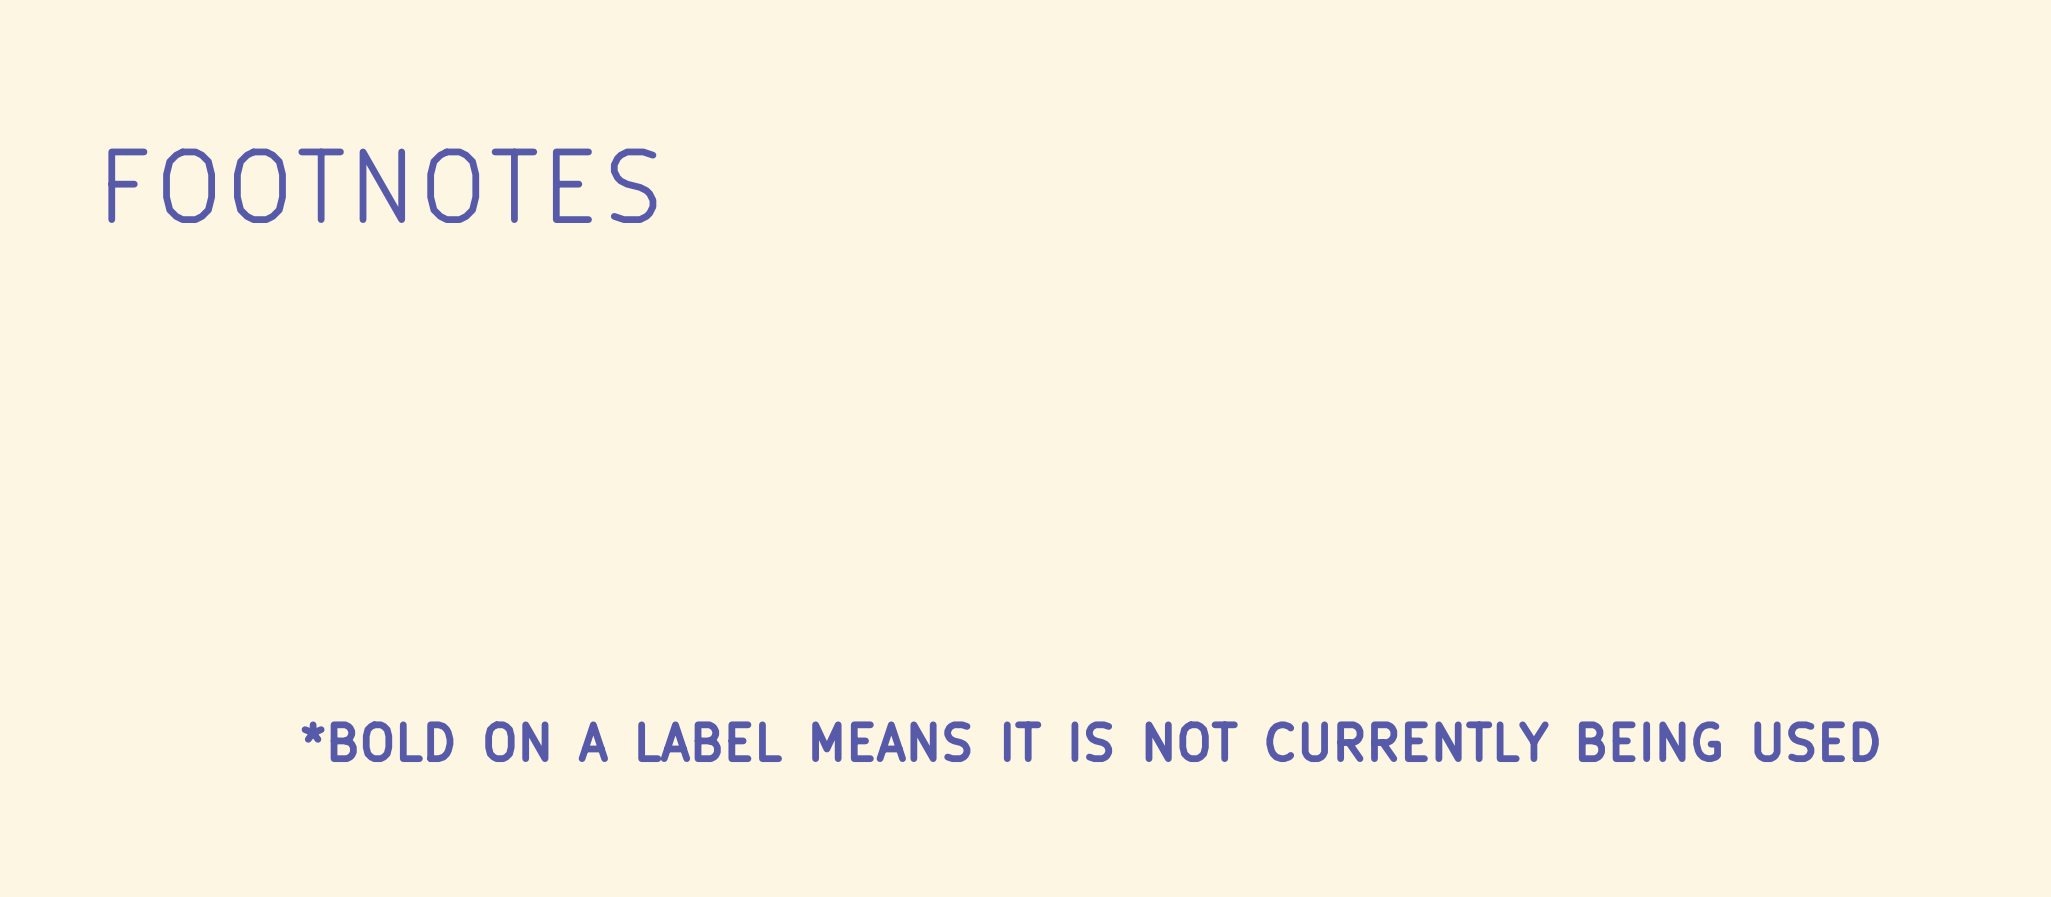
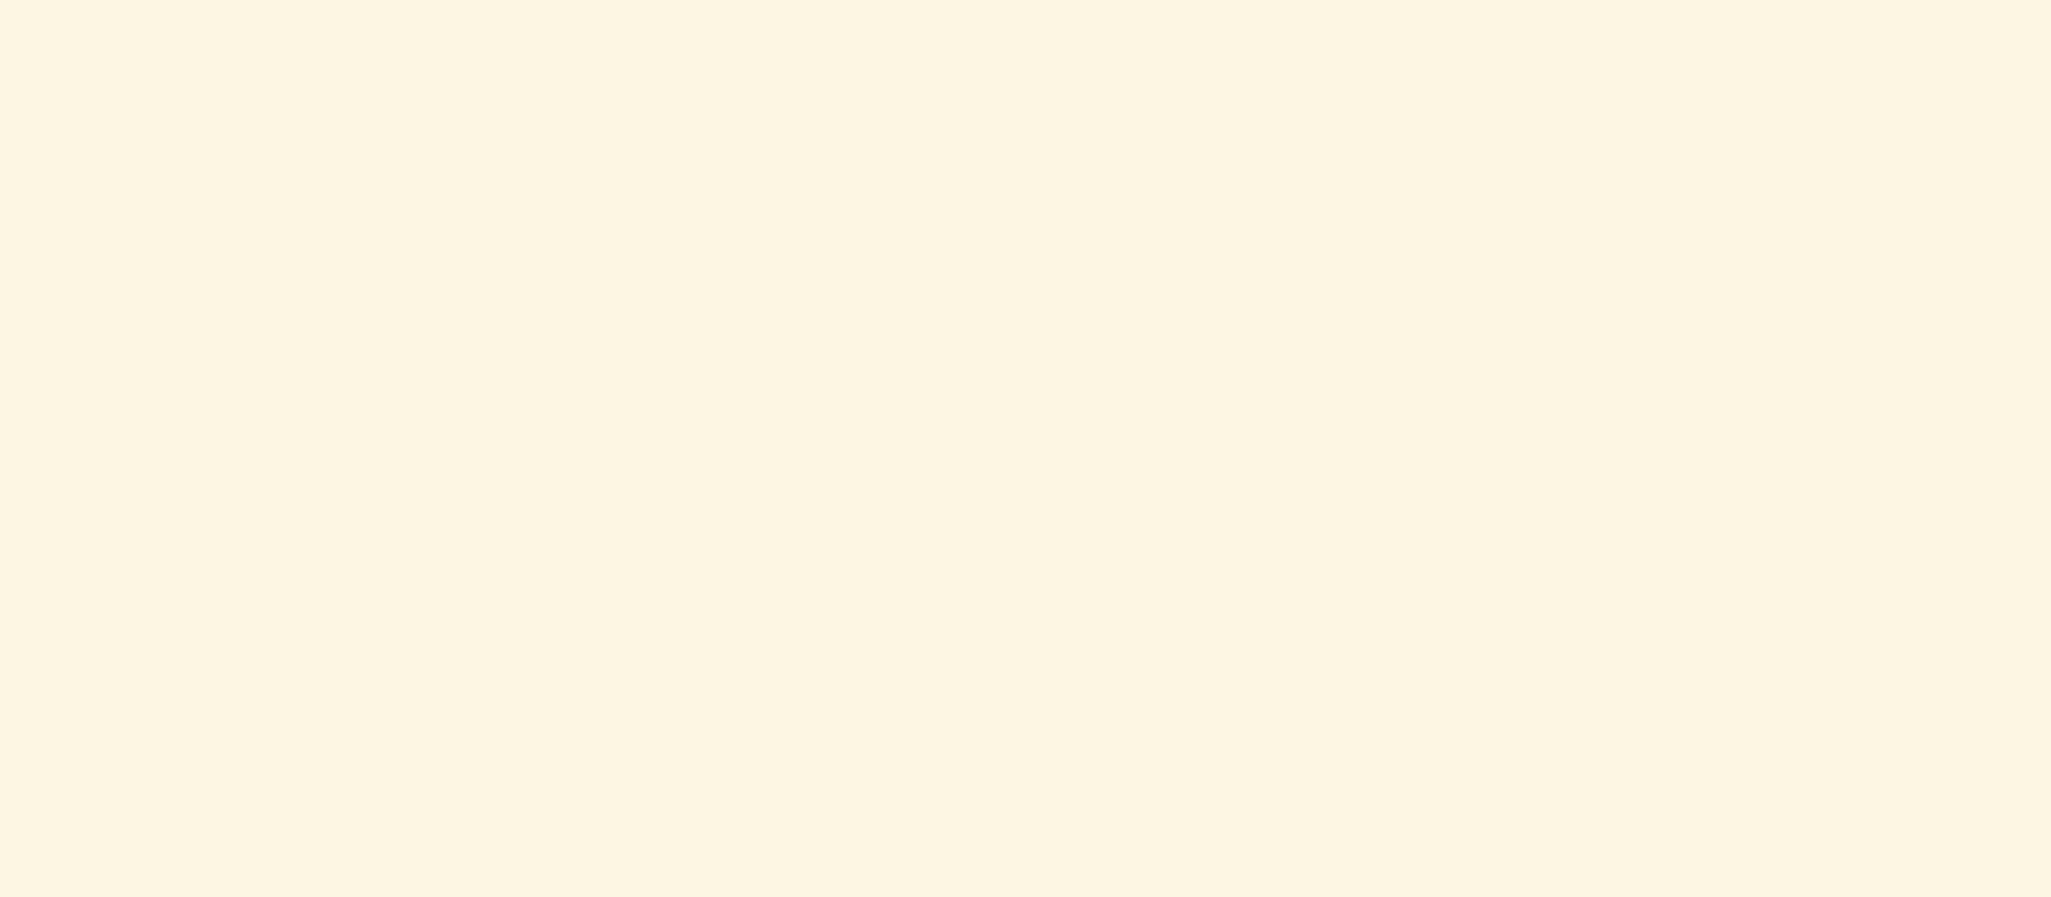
text: FOOTNOTES (382, 185) -> none
text: *BOLD ON A LABEL MEANS IT IS NOT CURRENTLY BEING USED (1090, 741) -> none

